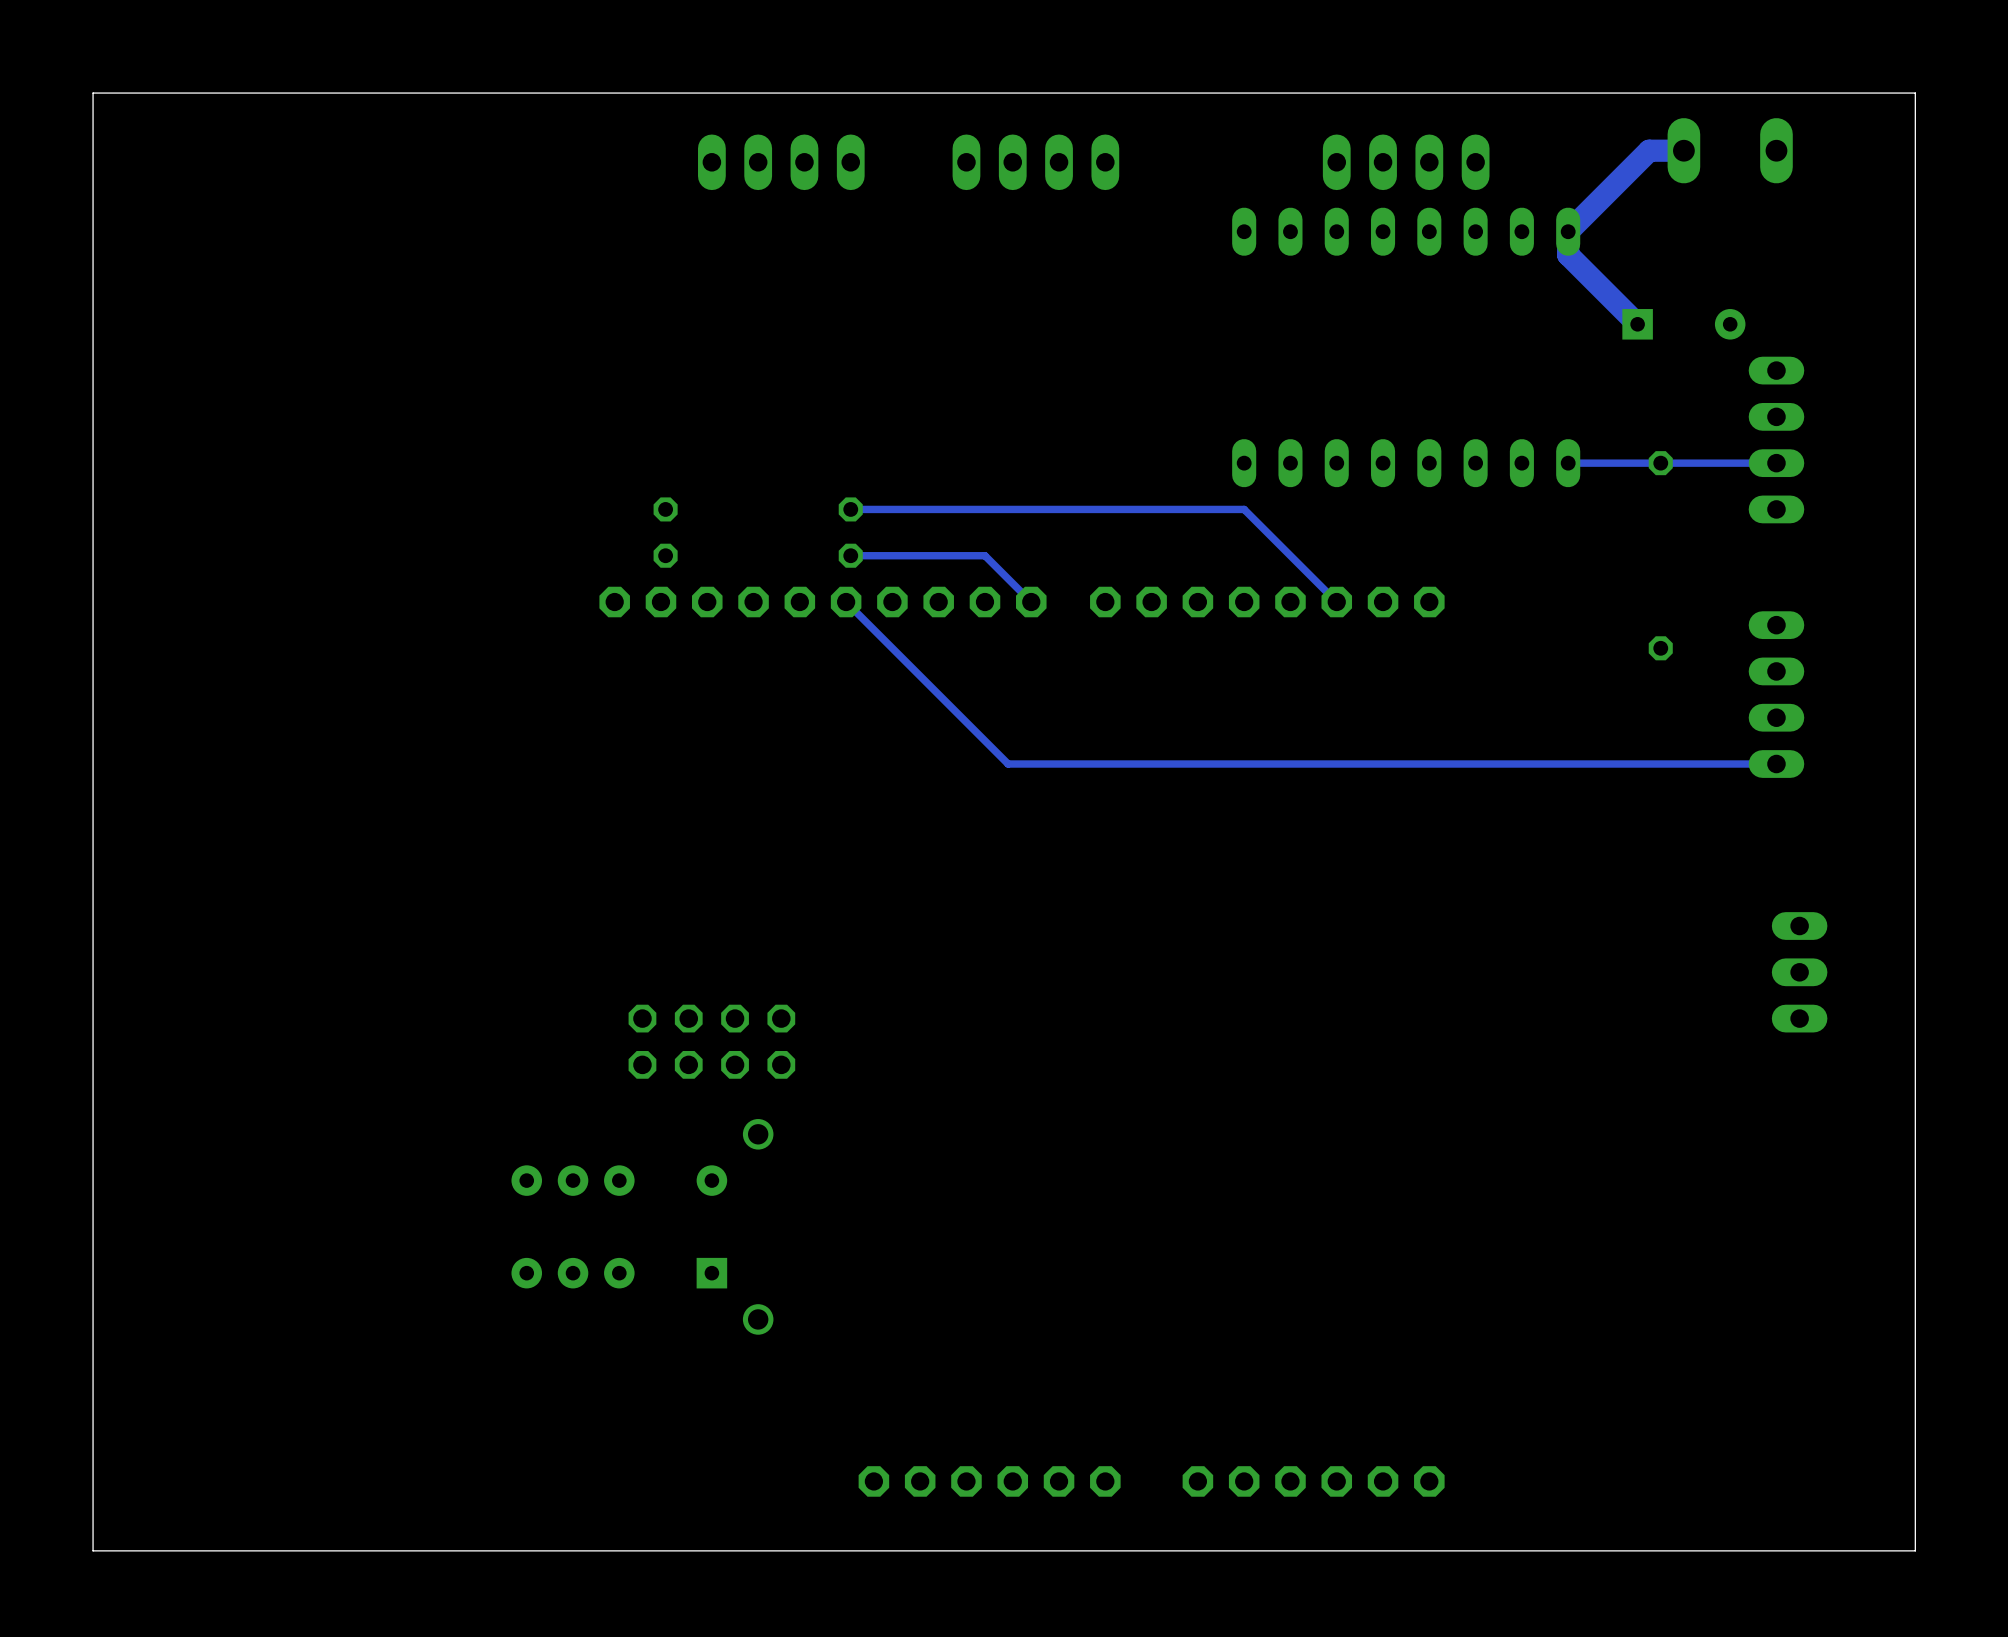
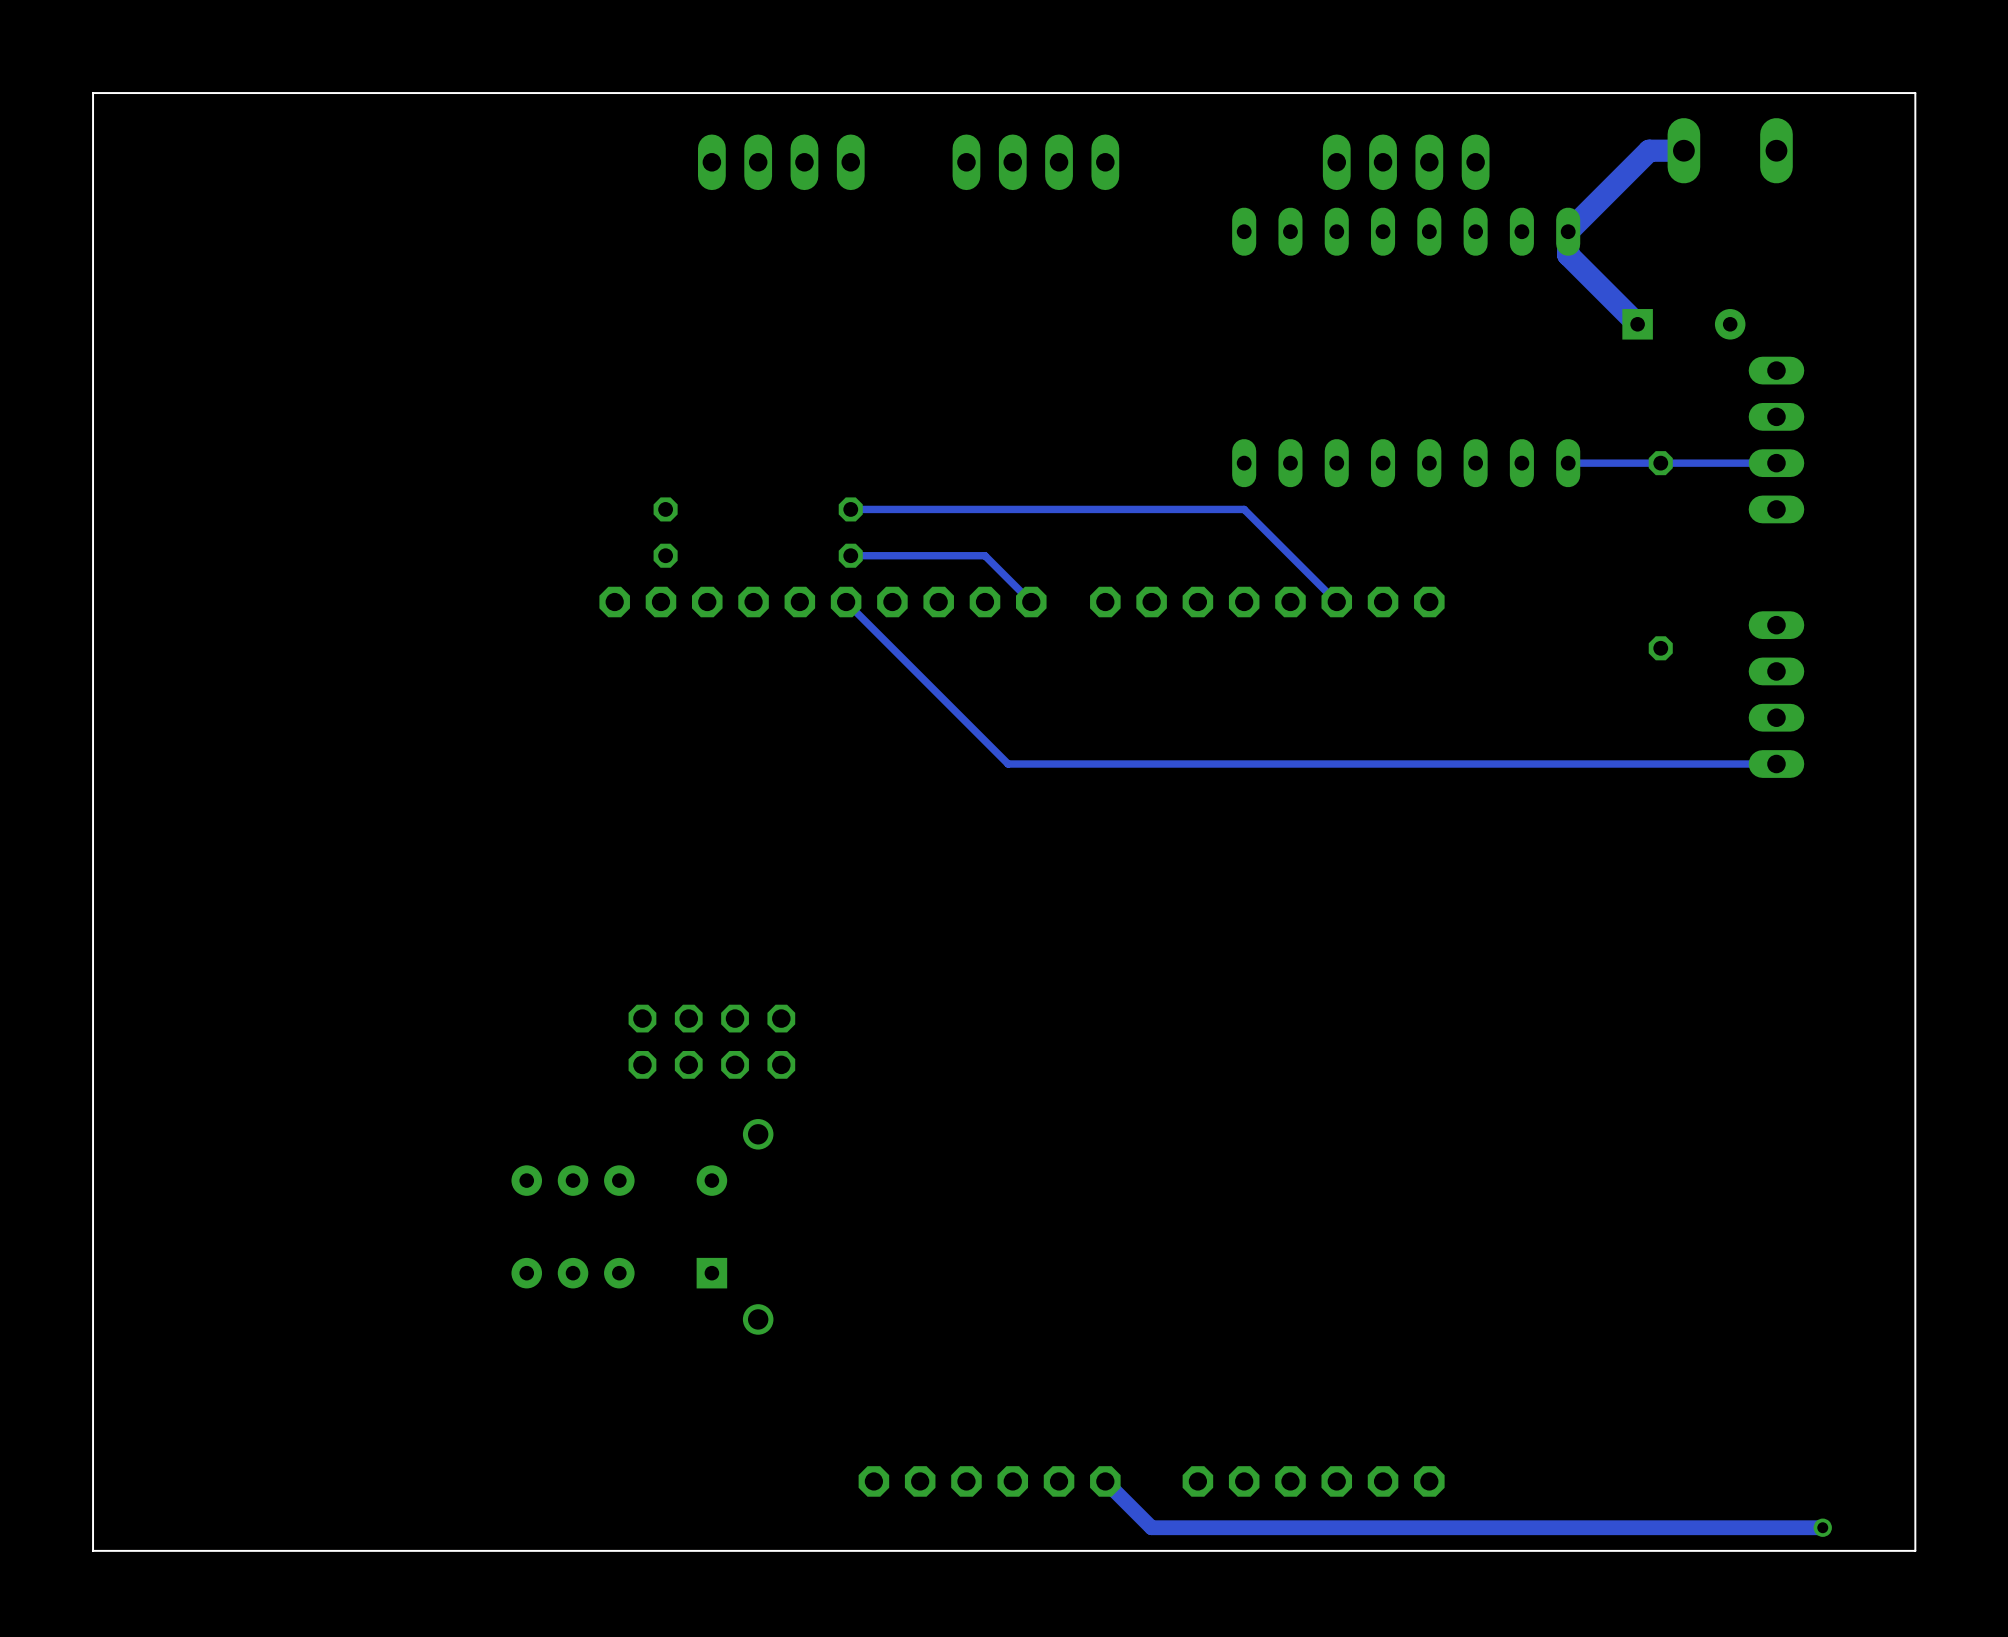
part: (1799, 972) -> none
track: none -> (1105, 1481) (1151, 1527) (1822, 1527)
via: none -> (1822, 1527)

